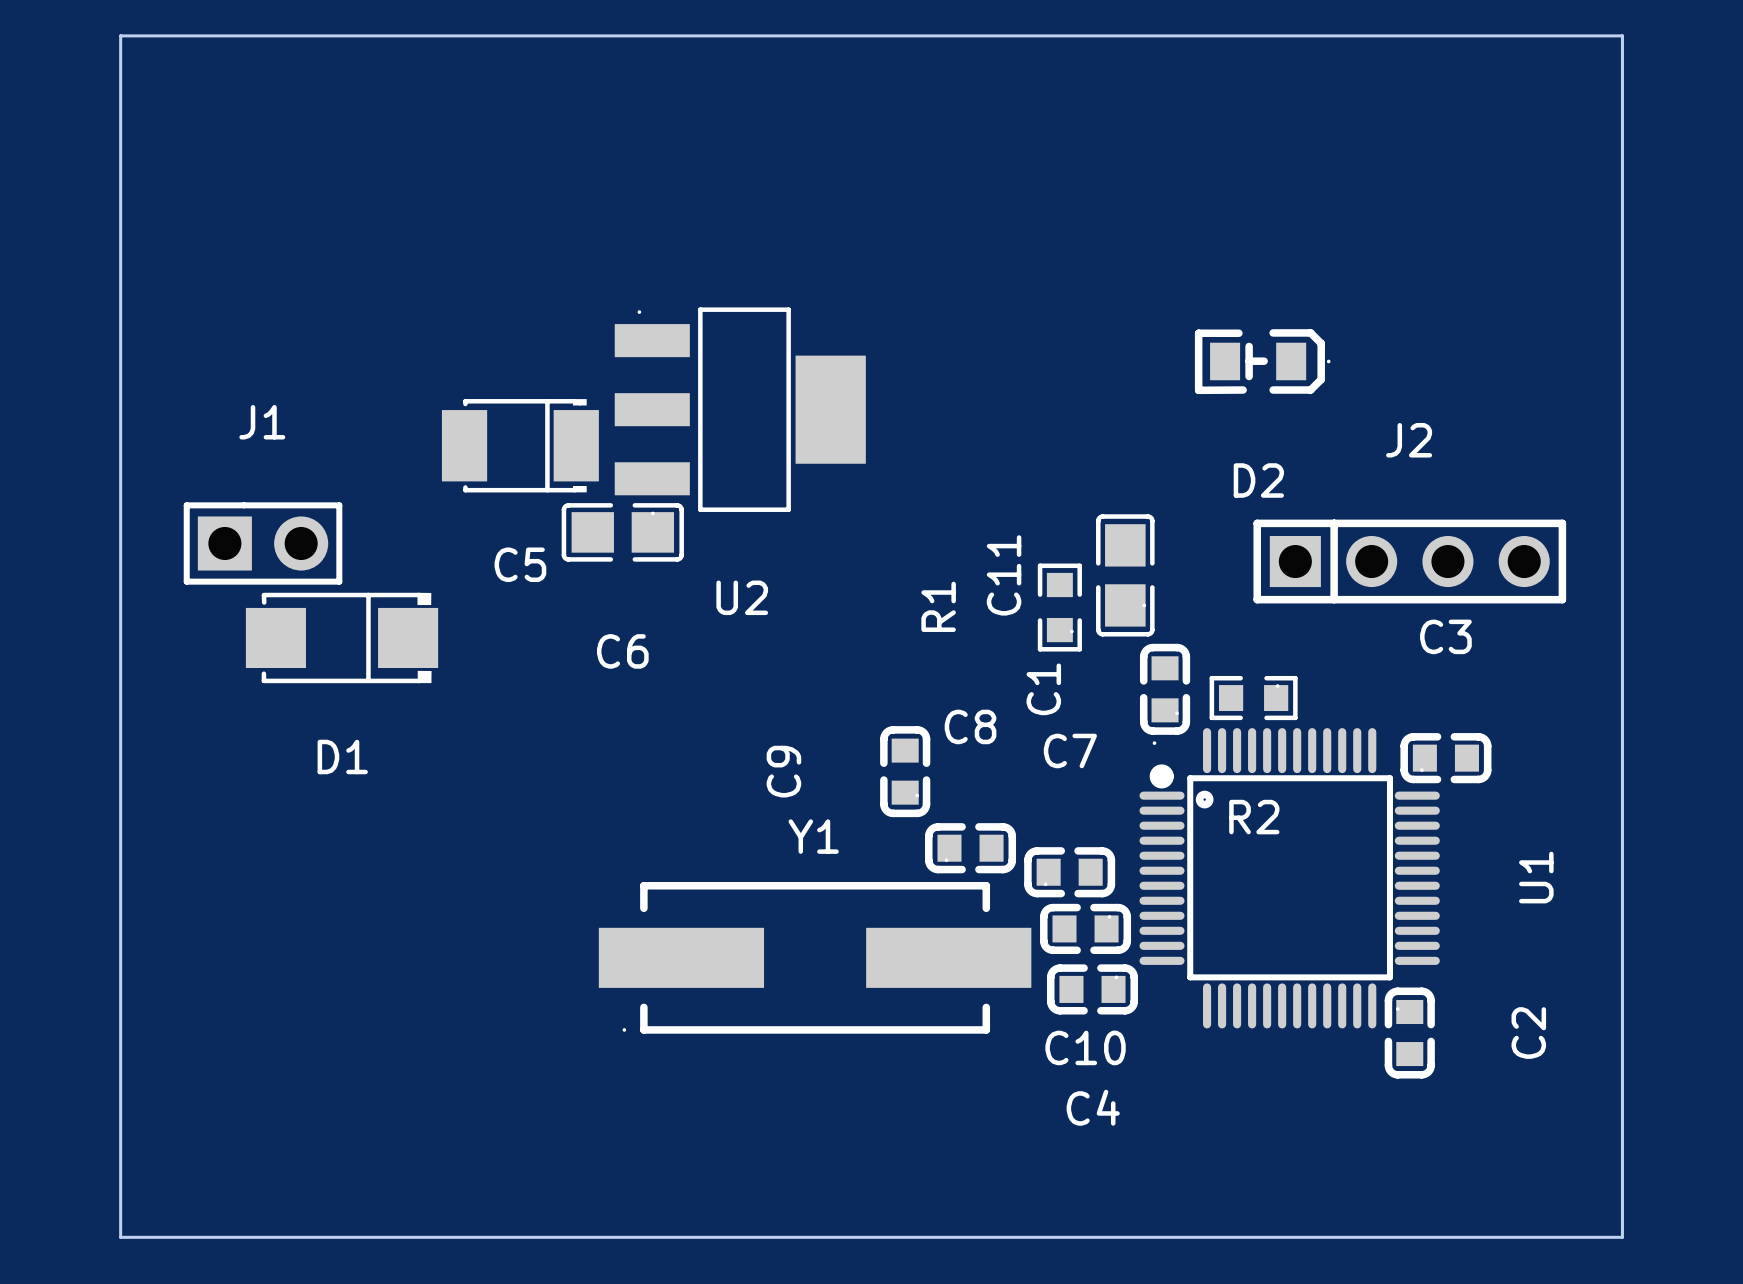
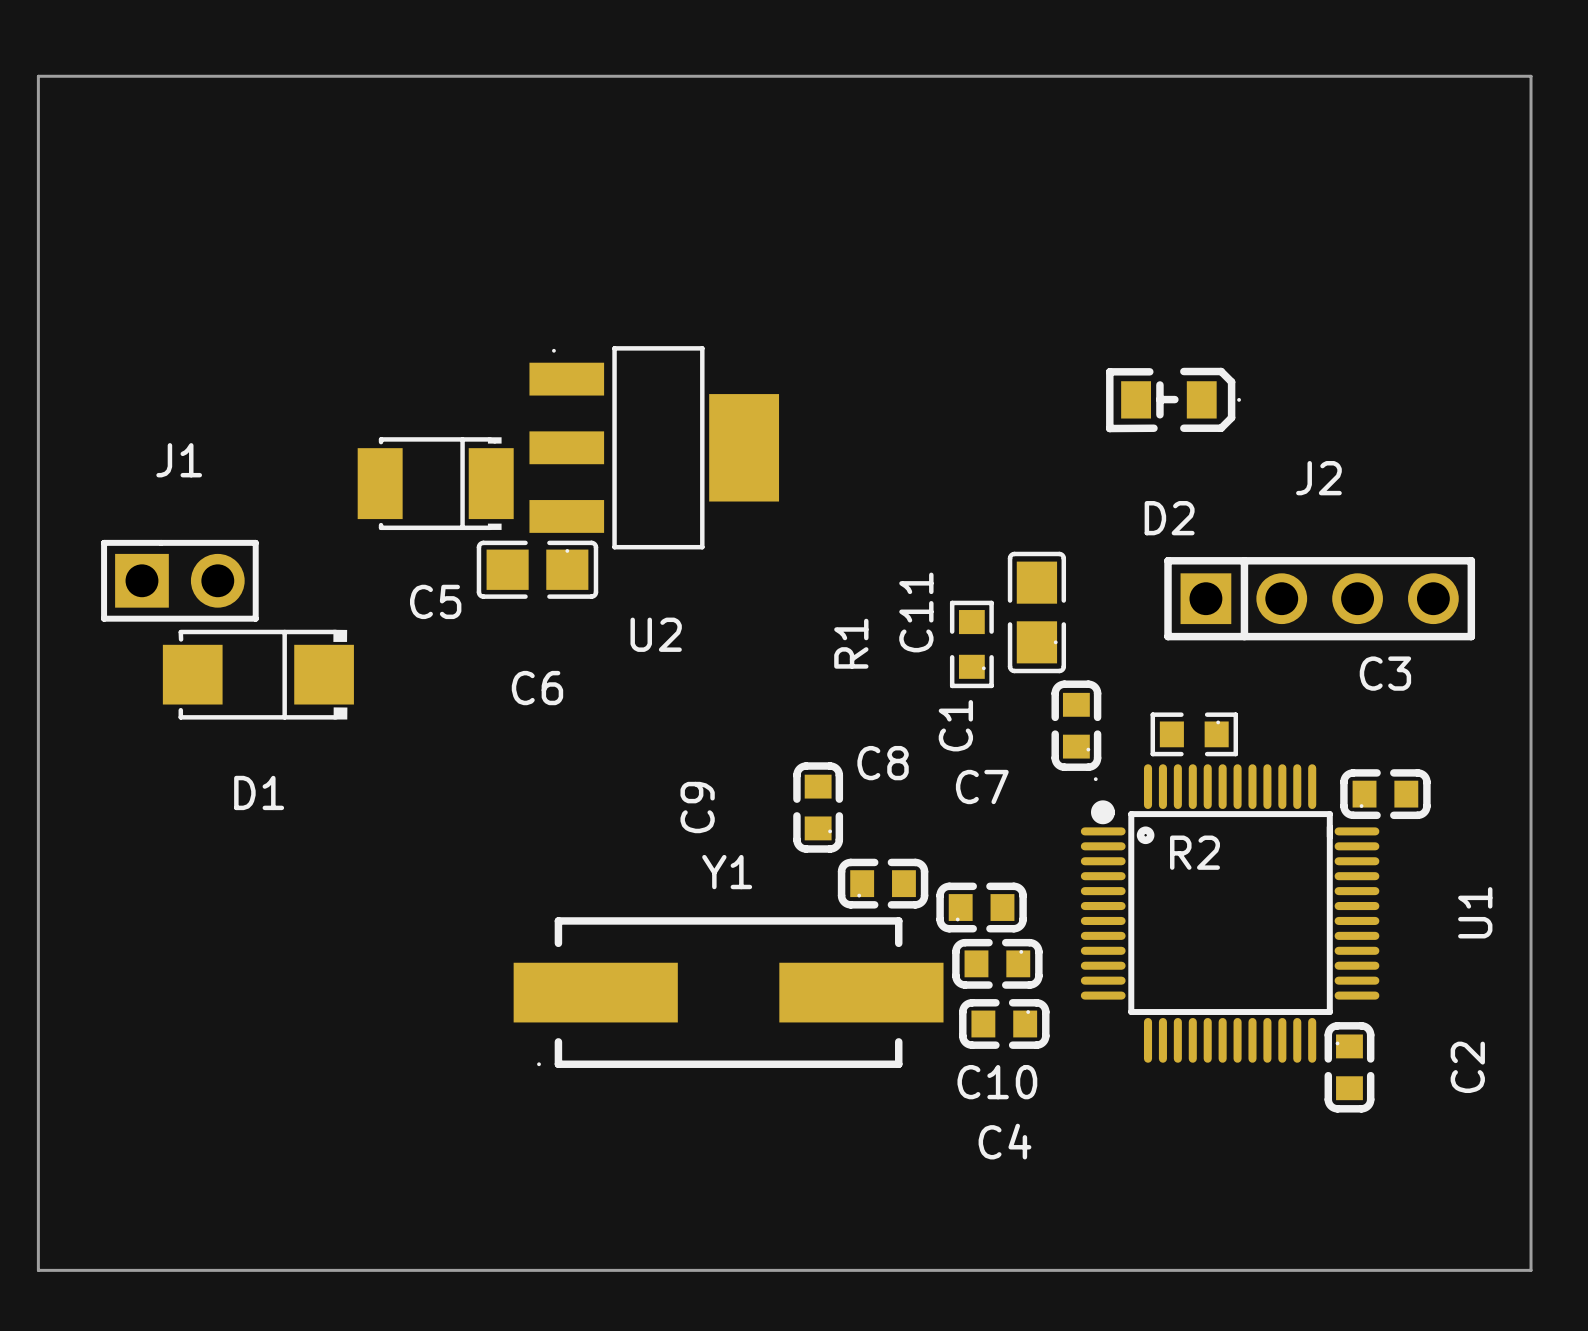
R2 position: (1253, 698) -> (1194, 734)
C3 position: (1445, 758) -> (1385, 794)
U1 position: (1289, 878) -> (1230, 913)
C2 position: (1409, 1033) -> (1349, 1067)

